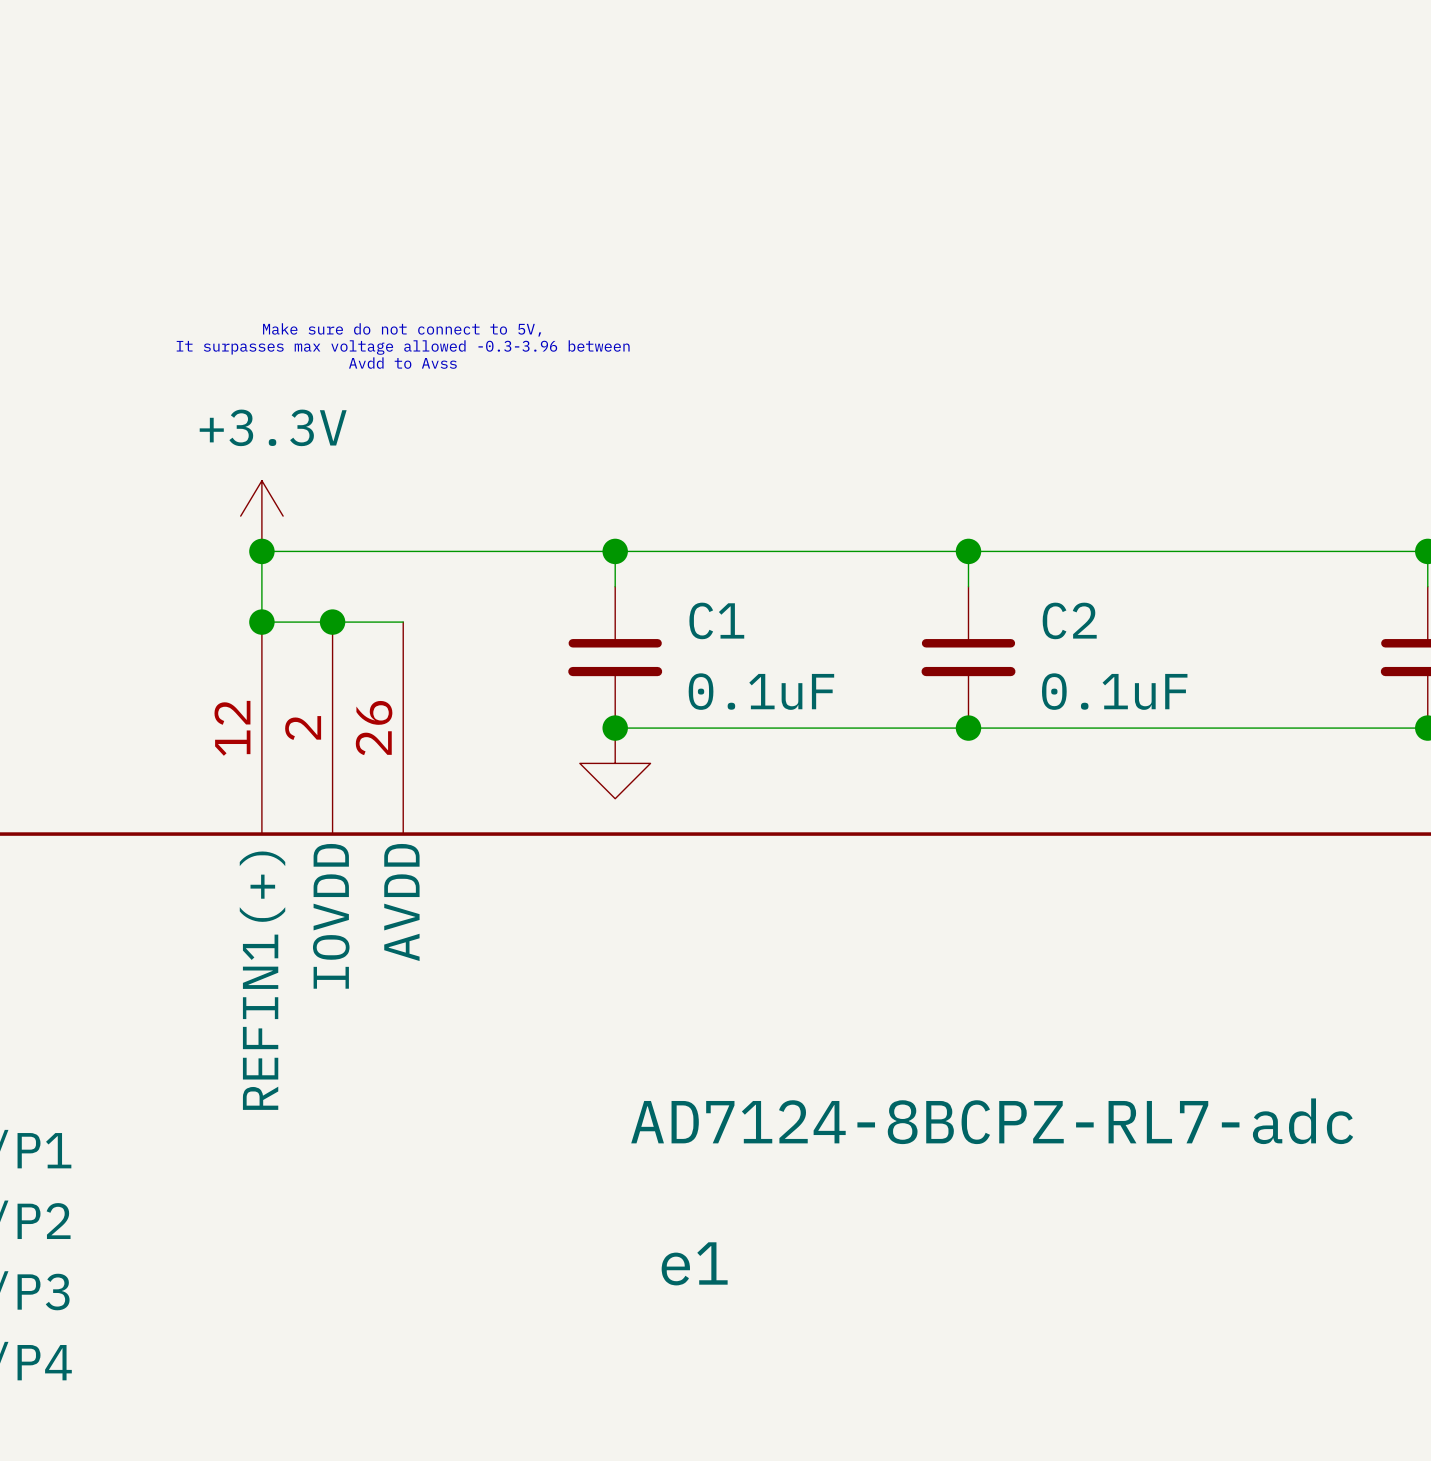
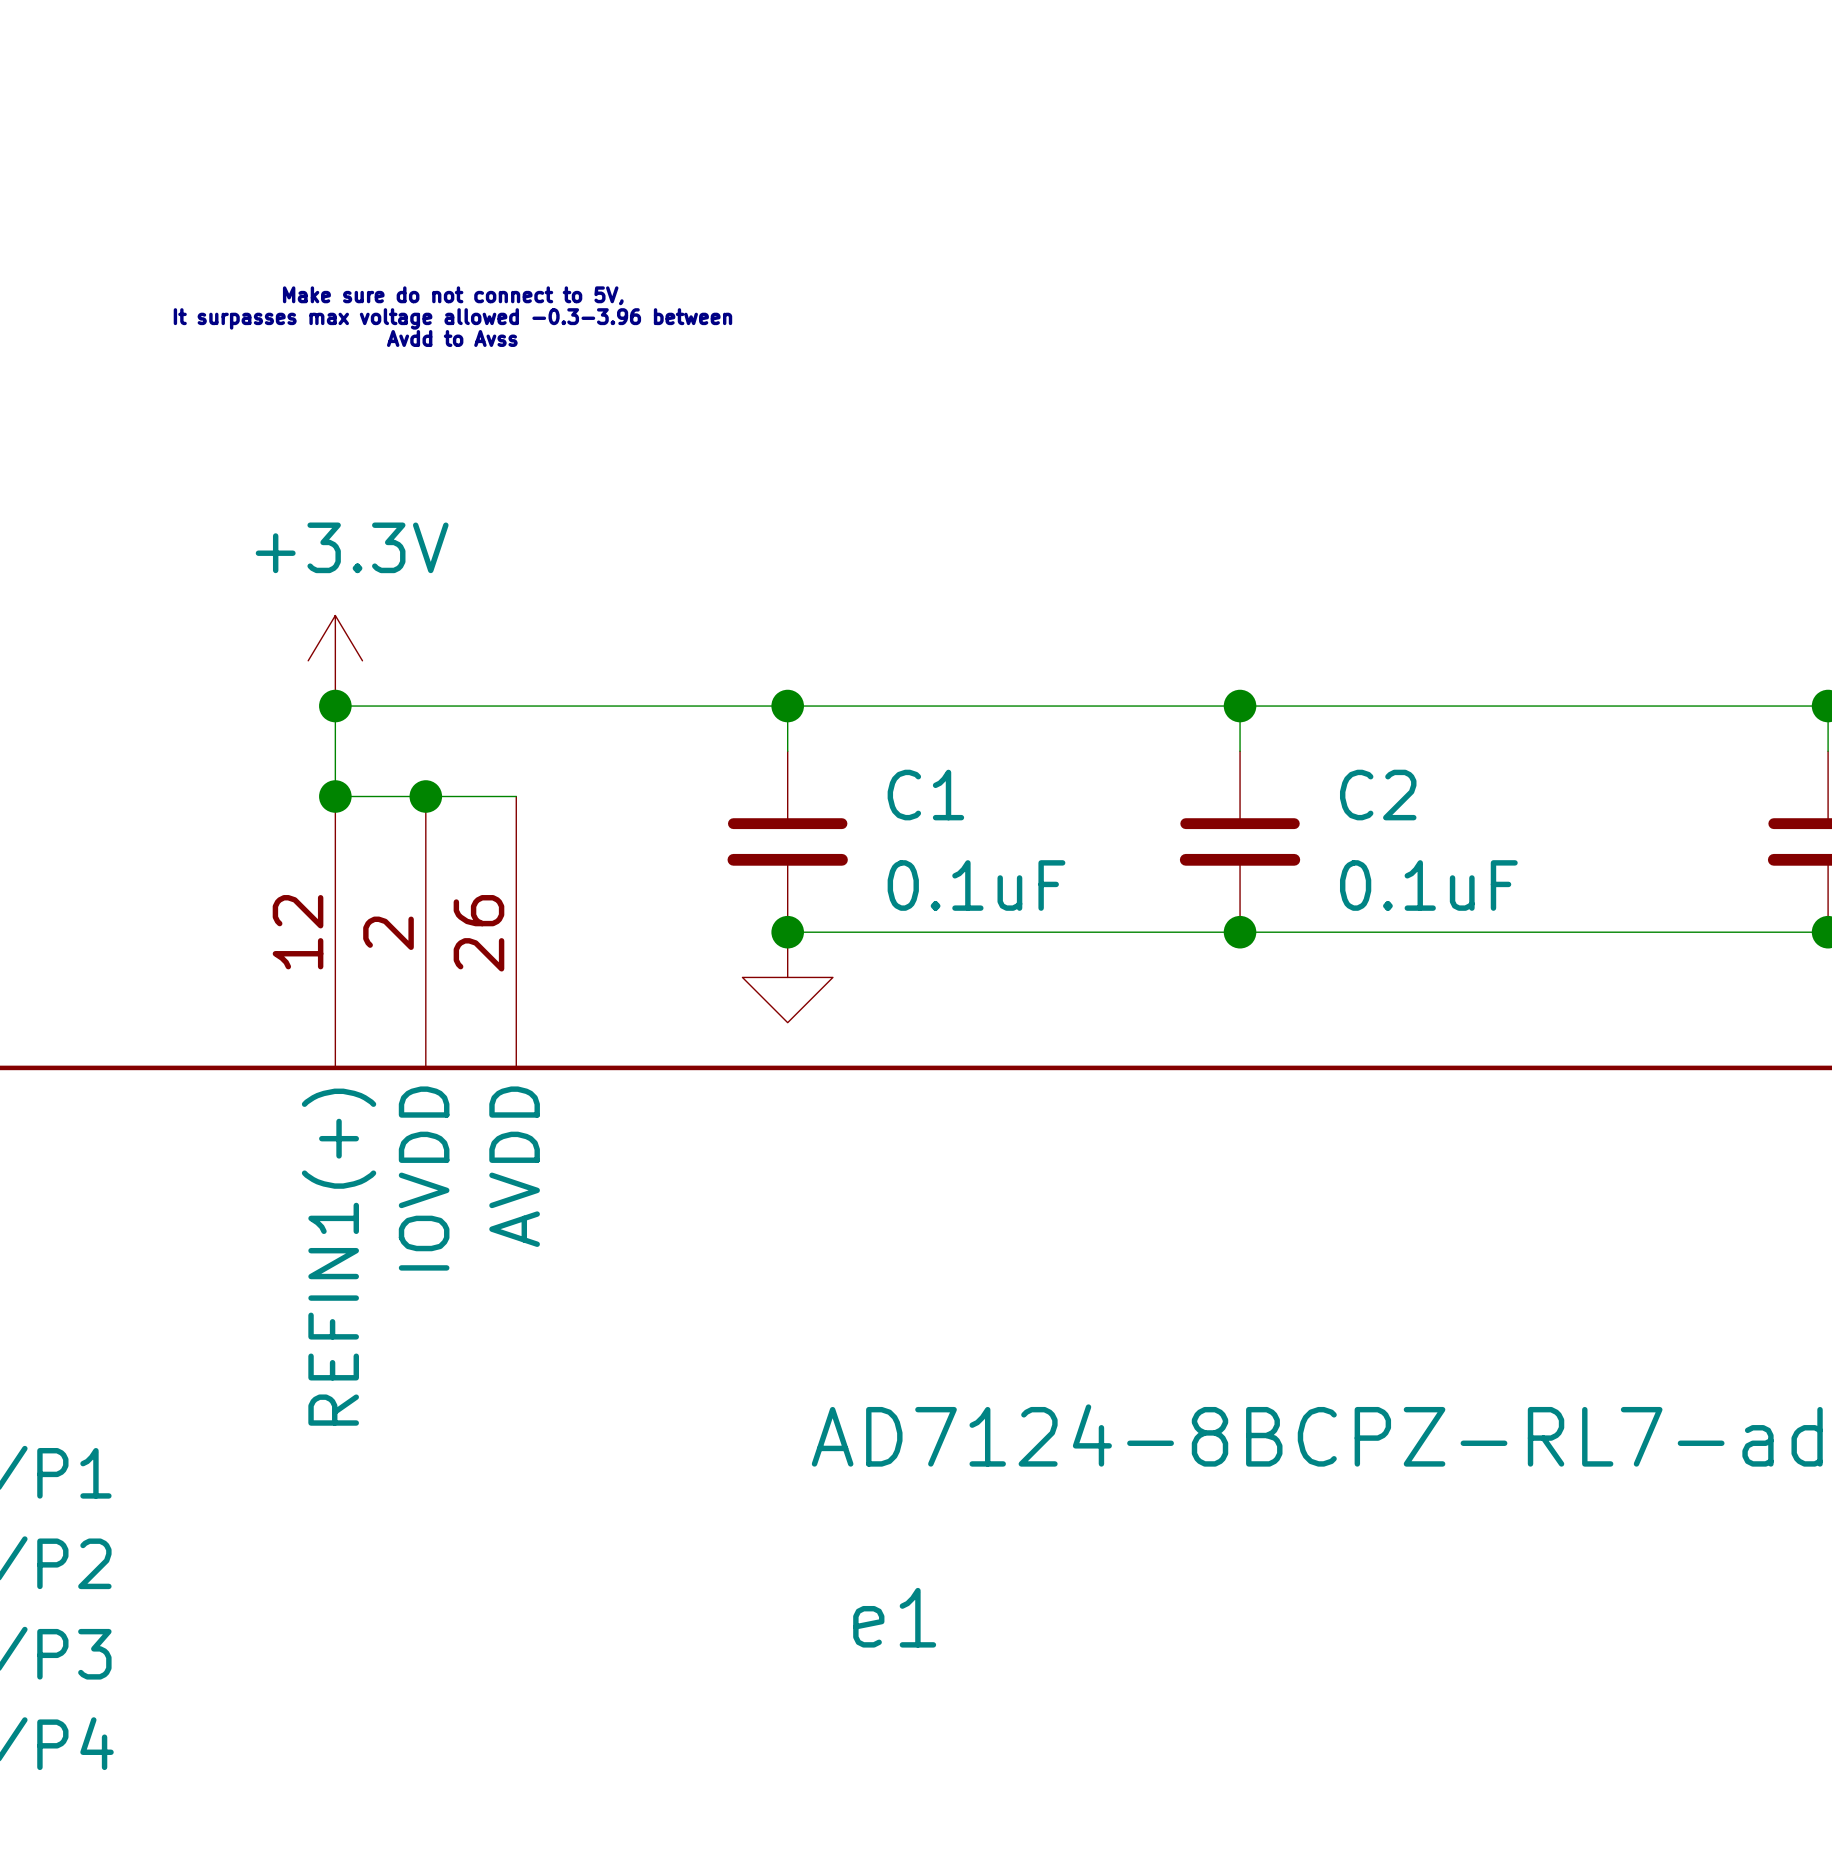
text position: Make sure do not connect to 5V, (402, 329) -> Make sure do not connect to 5V, (453, 295)
text position: It surpasses max voltage allowed -0.3-3.96 between (403, 347) -> It surpasses max voltage allowed -0.3-3.96 between (452, 318)
text position: Avdd to Avss (402, 363) -> Avdd to Avss (452, 338)

